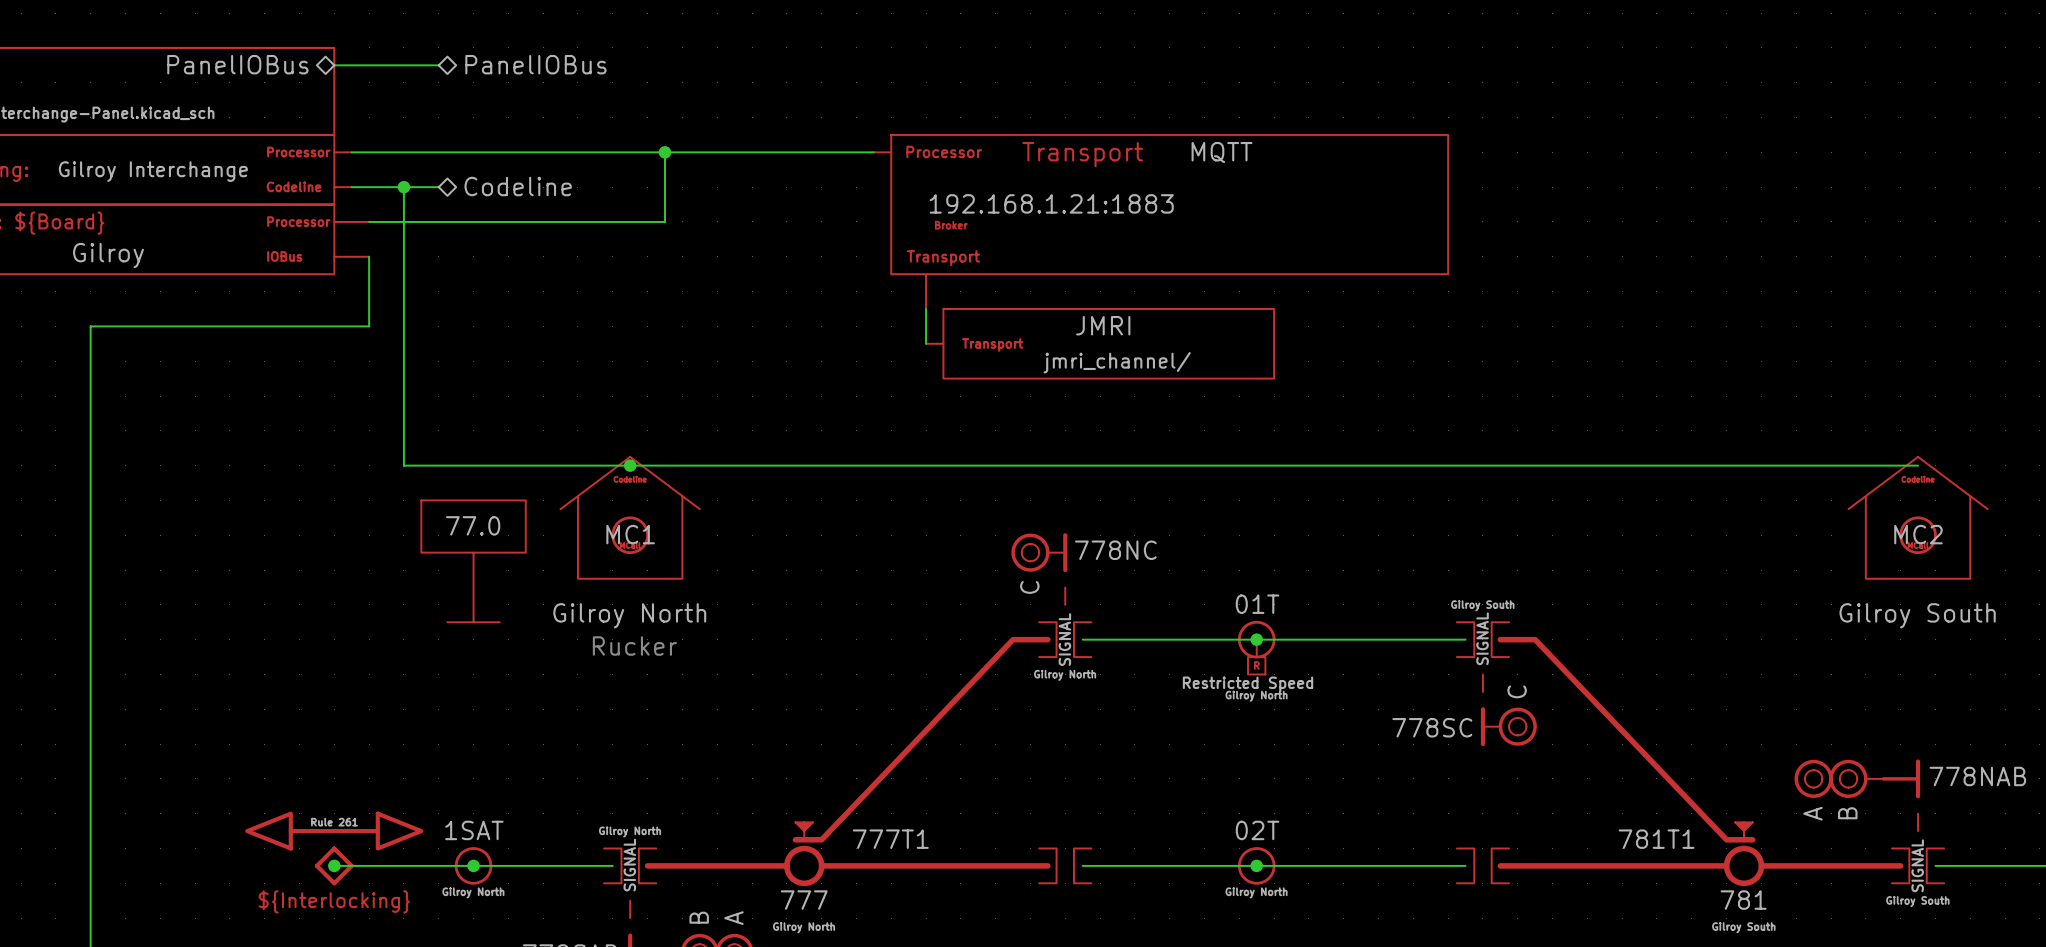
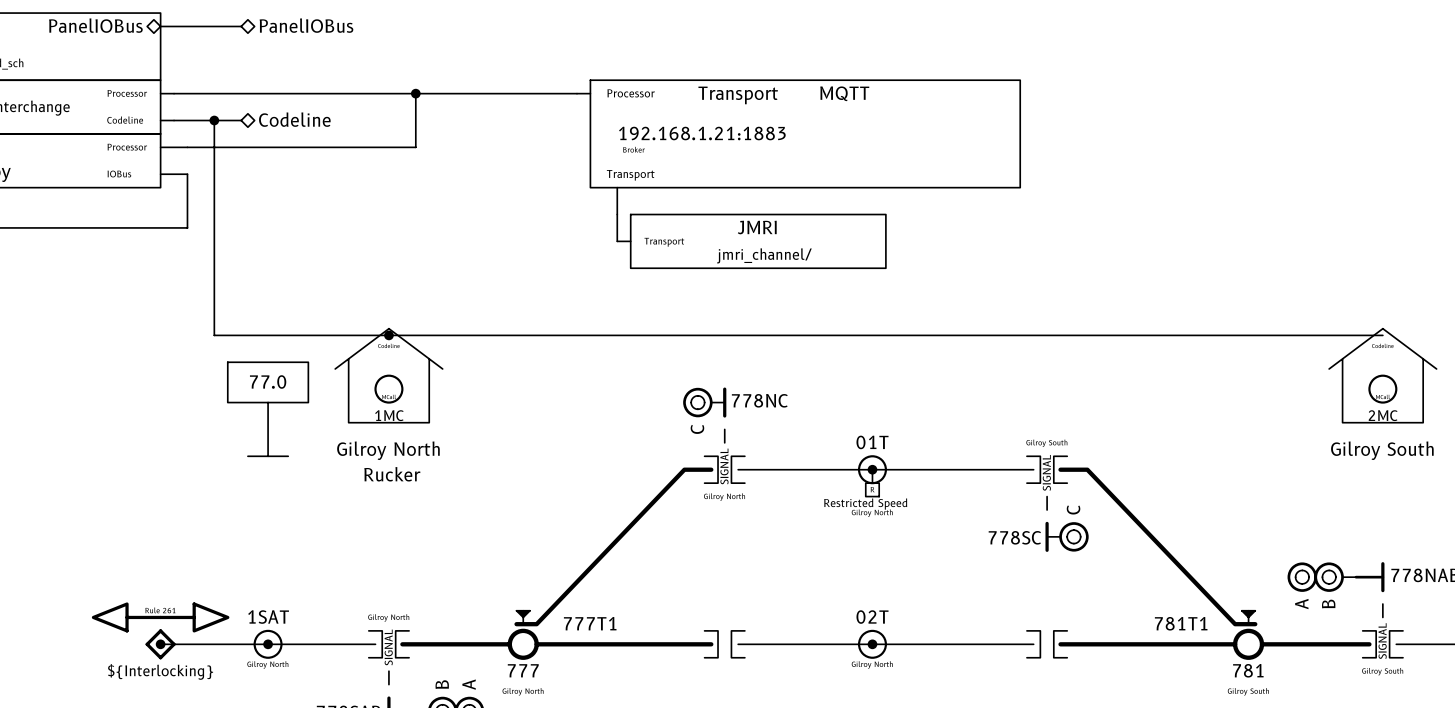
part value: MC1 (630, 534) -> none
part value: MC2 (1918, 534) -> none
part text: none -> 1MC (389, 415)
part text: none -> 2MC (1383, 415)

